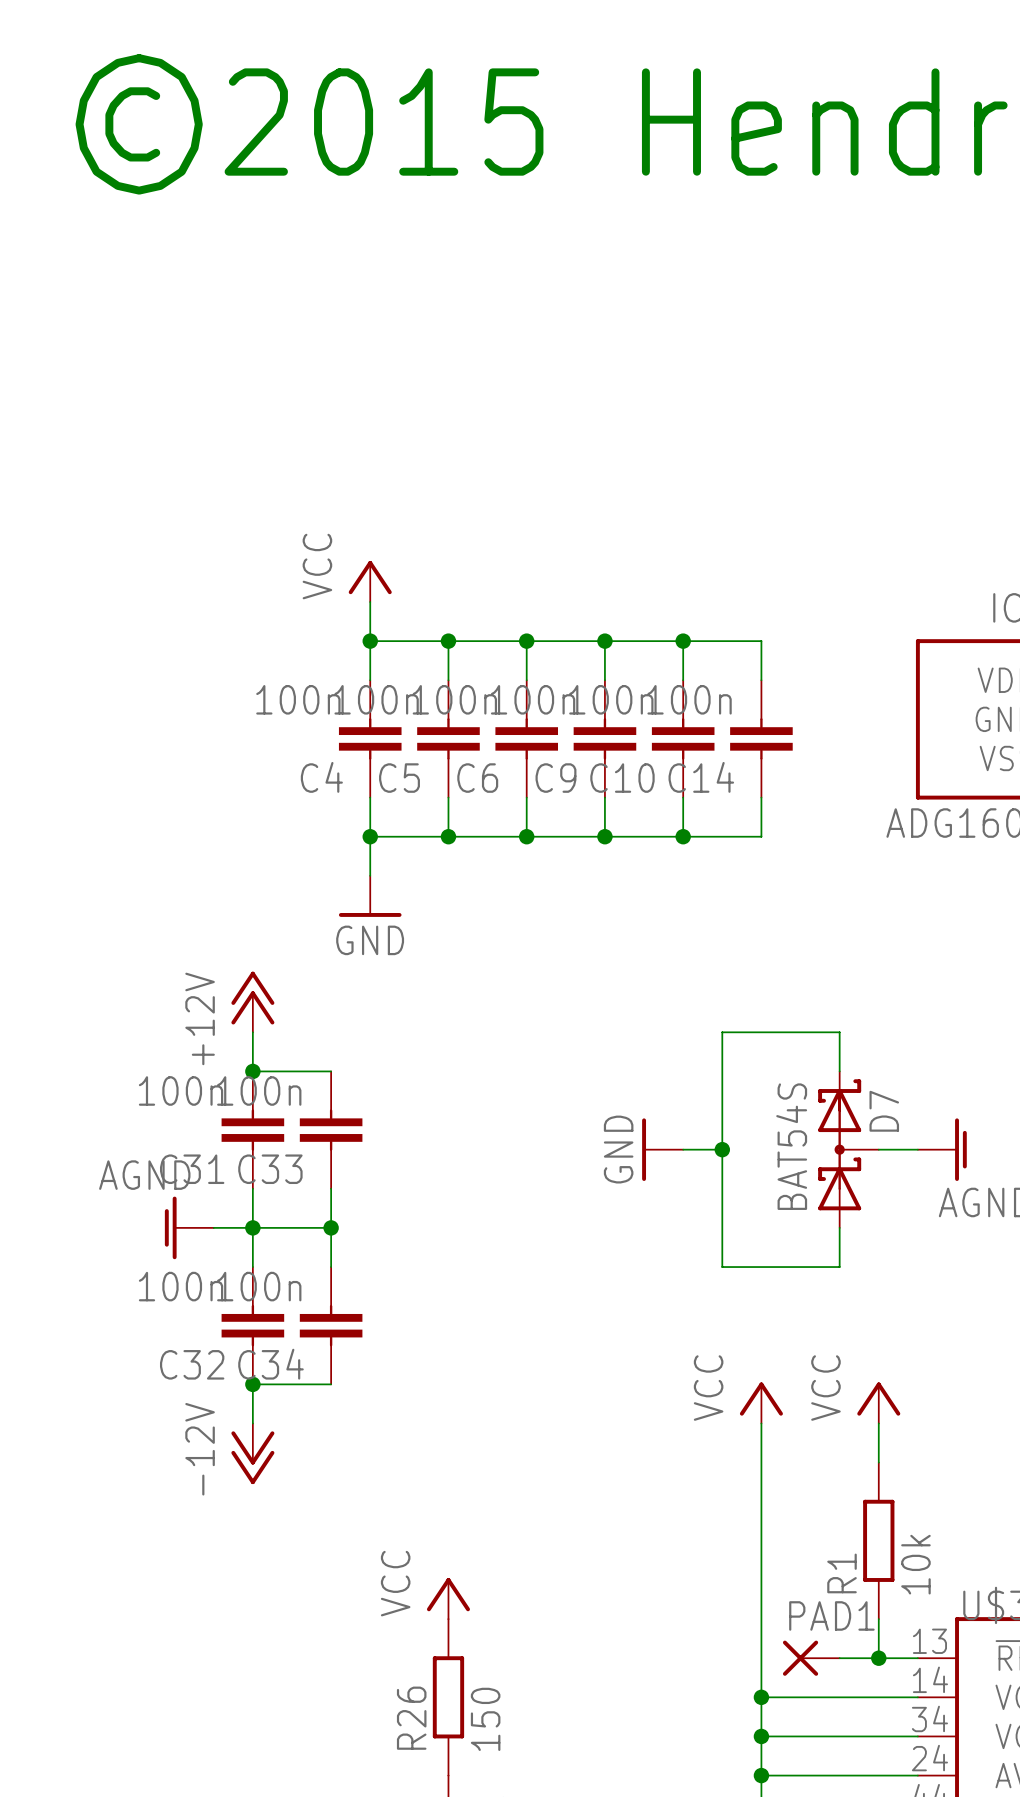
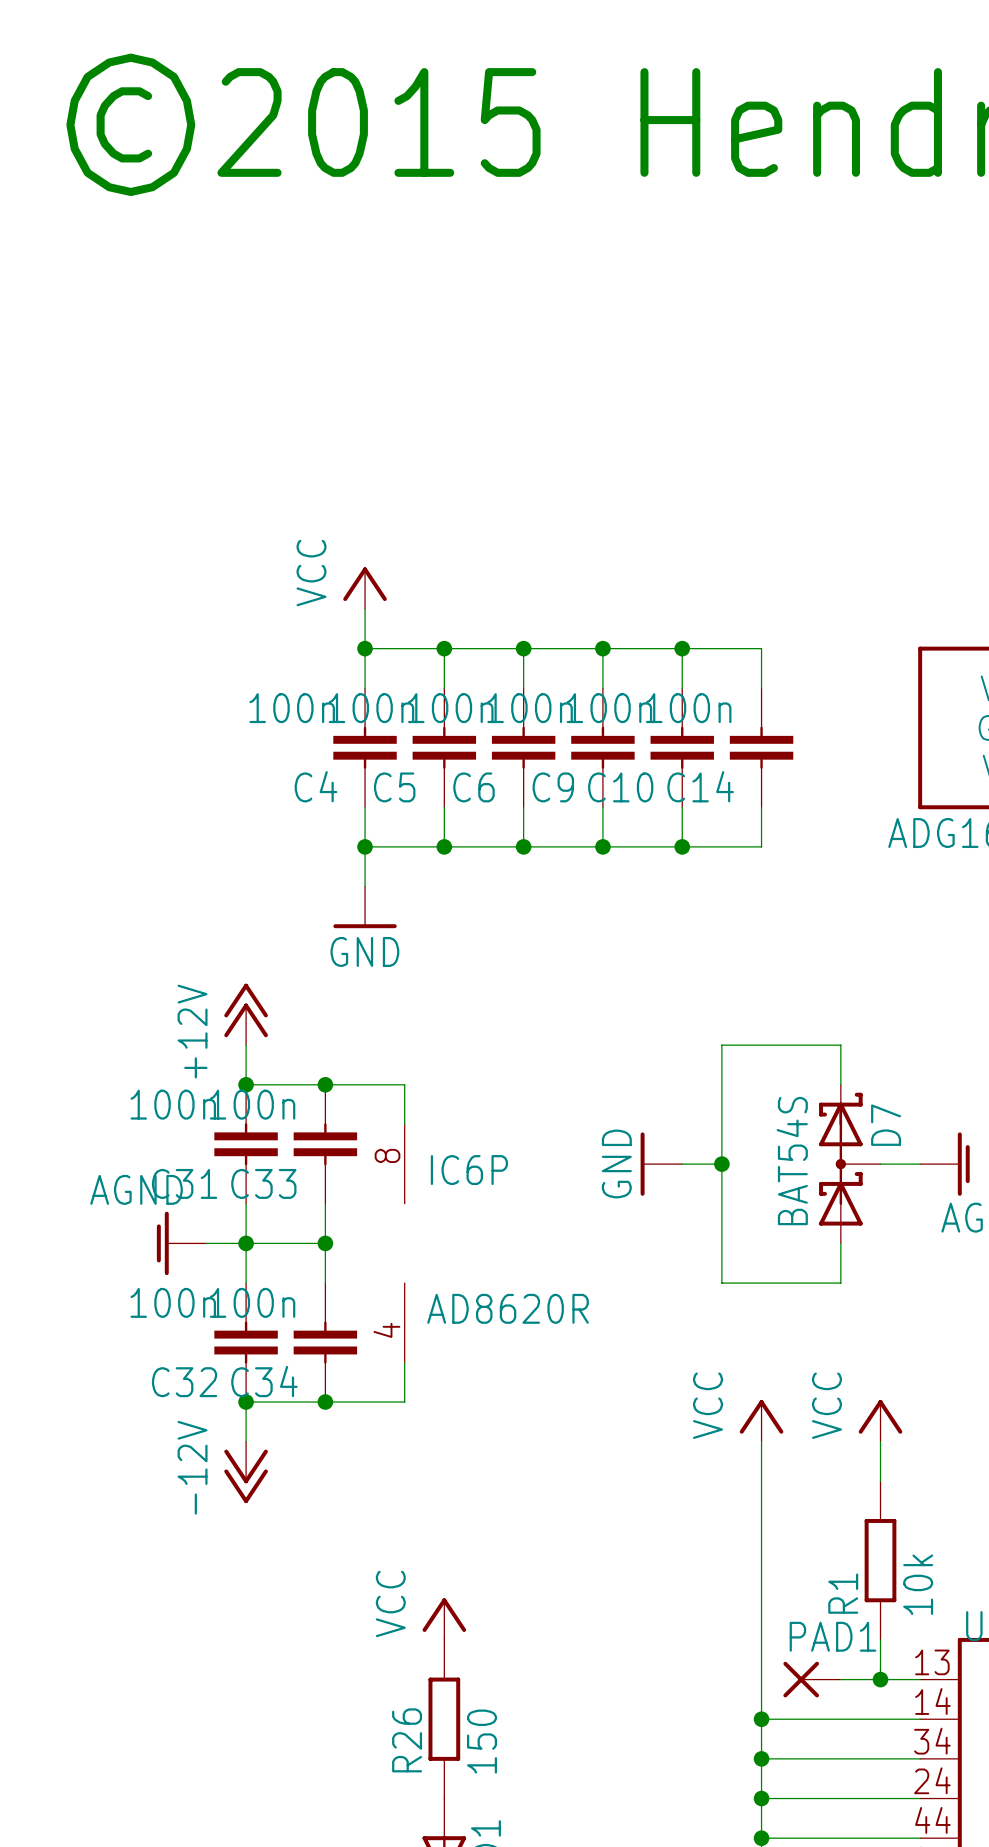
wire: none -> (325, 1084) (404, 1084) (404, 1124)
junction: none -> (325, 1084)
IC6P: none -> AD8620R (404, 1243)
wire: none -> (404, 1362) (404, 1402) (325, 1402)
junction: none -> (325, 1402)

